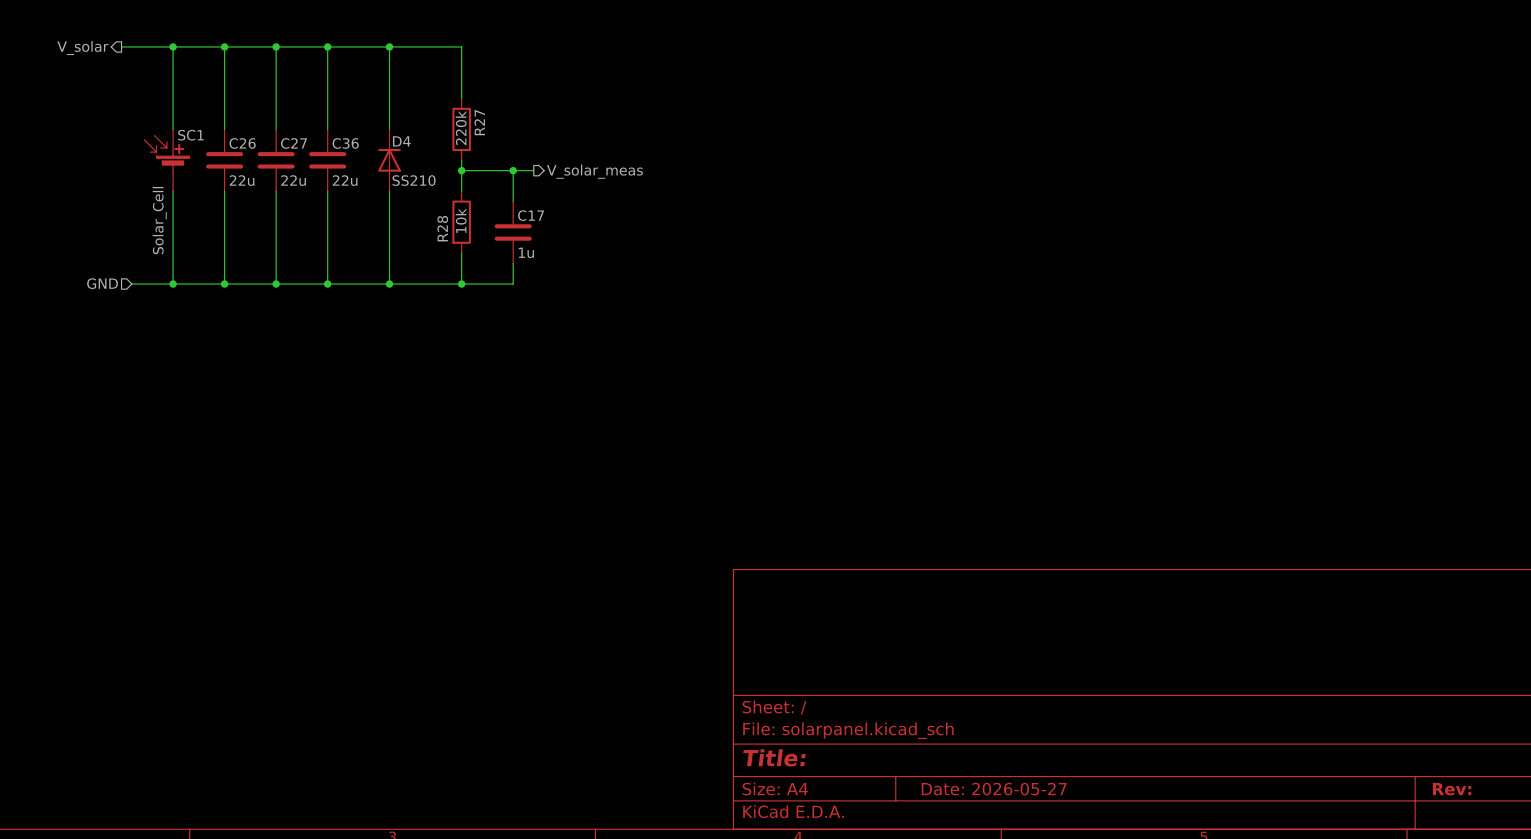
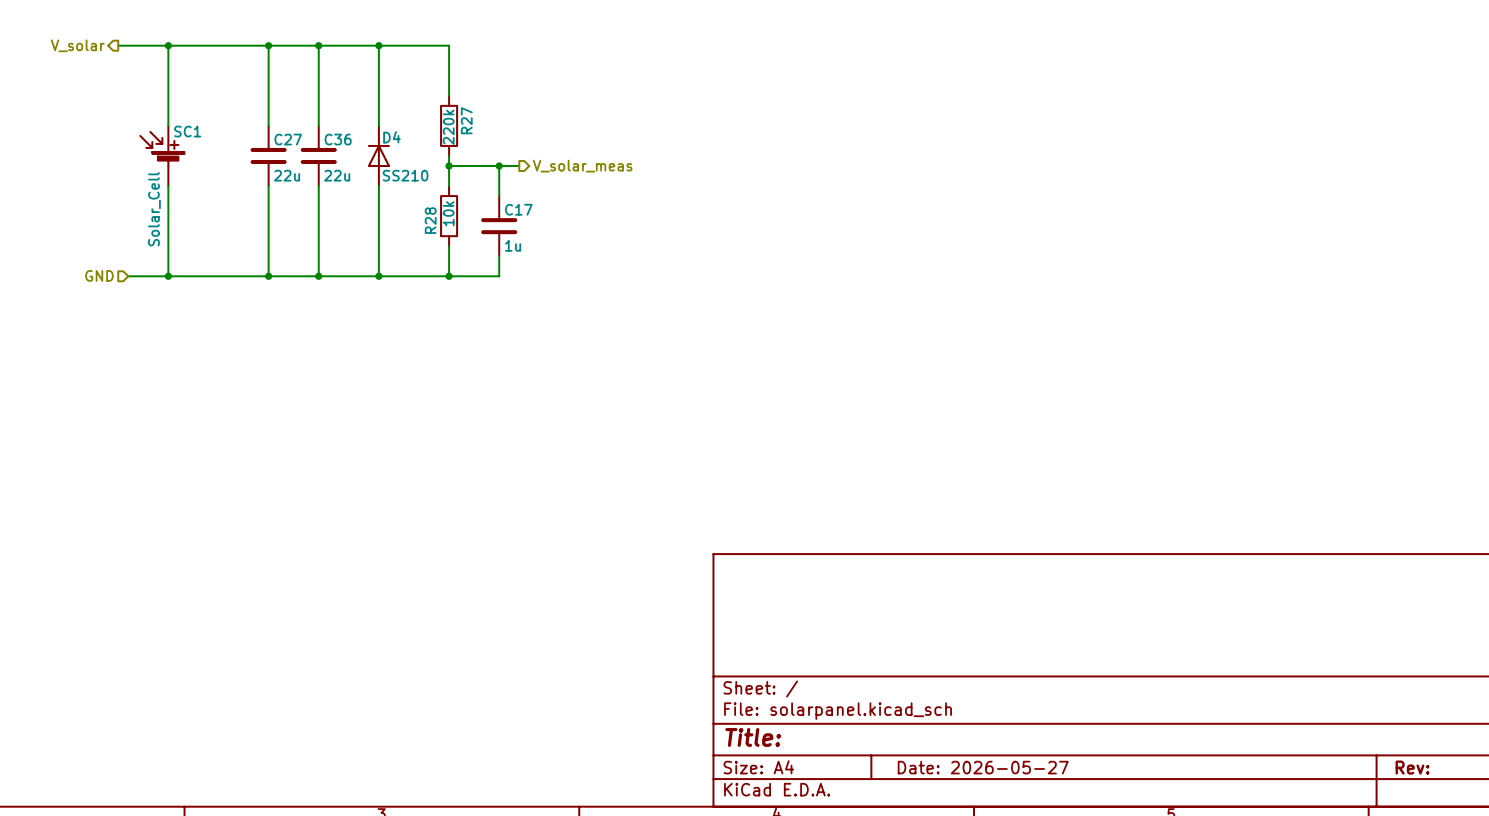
wire: (224, 46) (224, 129) -> none
junction: (224, 46) -> none
C26: 22u (224, 160) -> none
wire: (224, 191) (224, 284) -> none
junction: (224, 284) -> none

